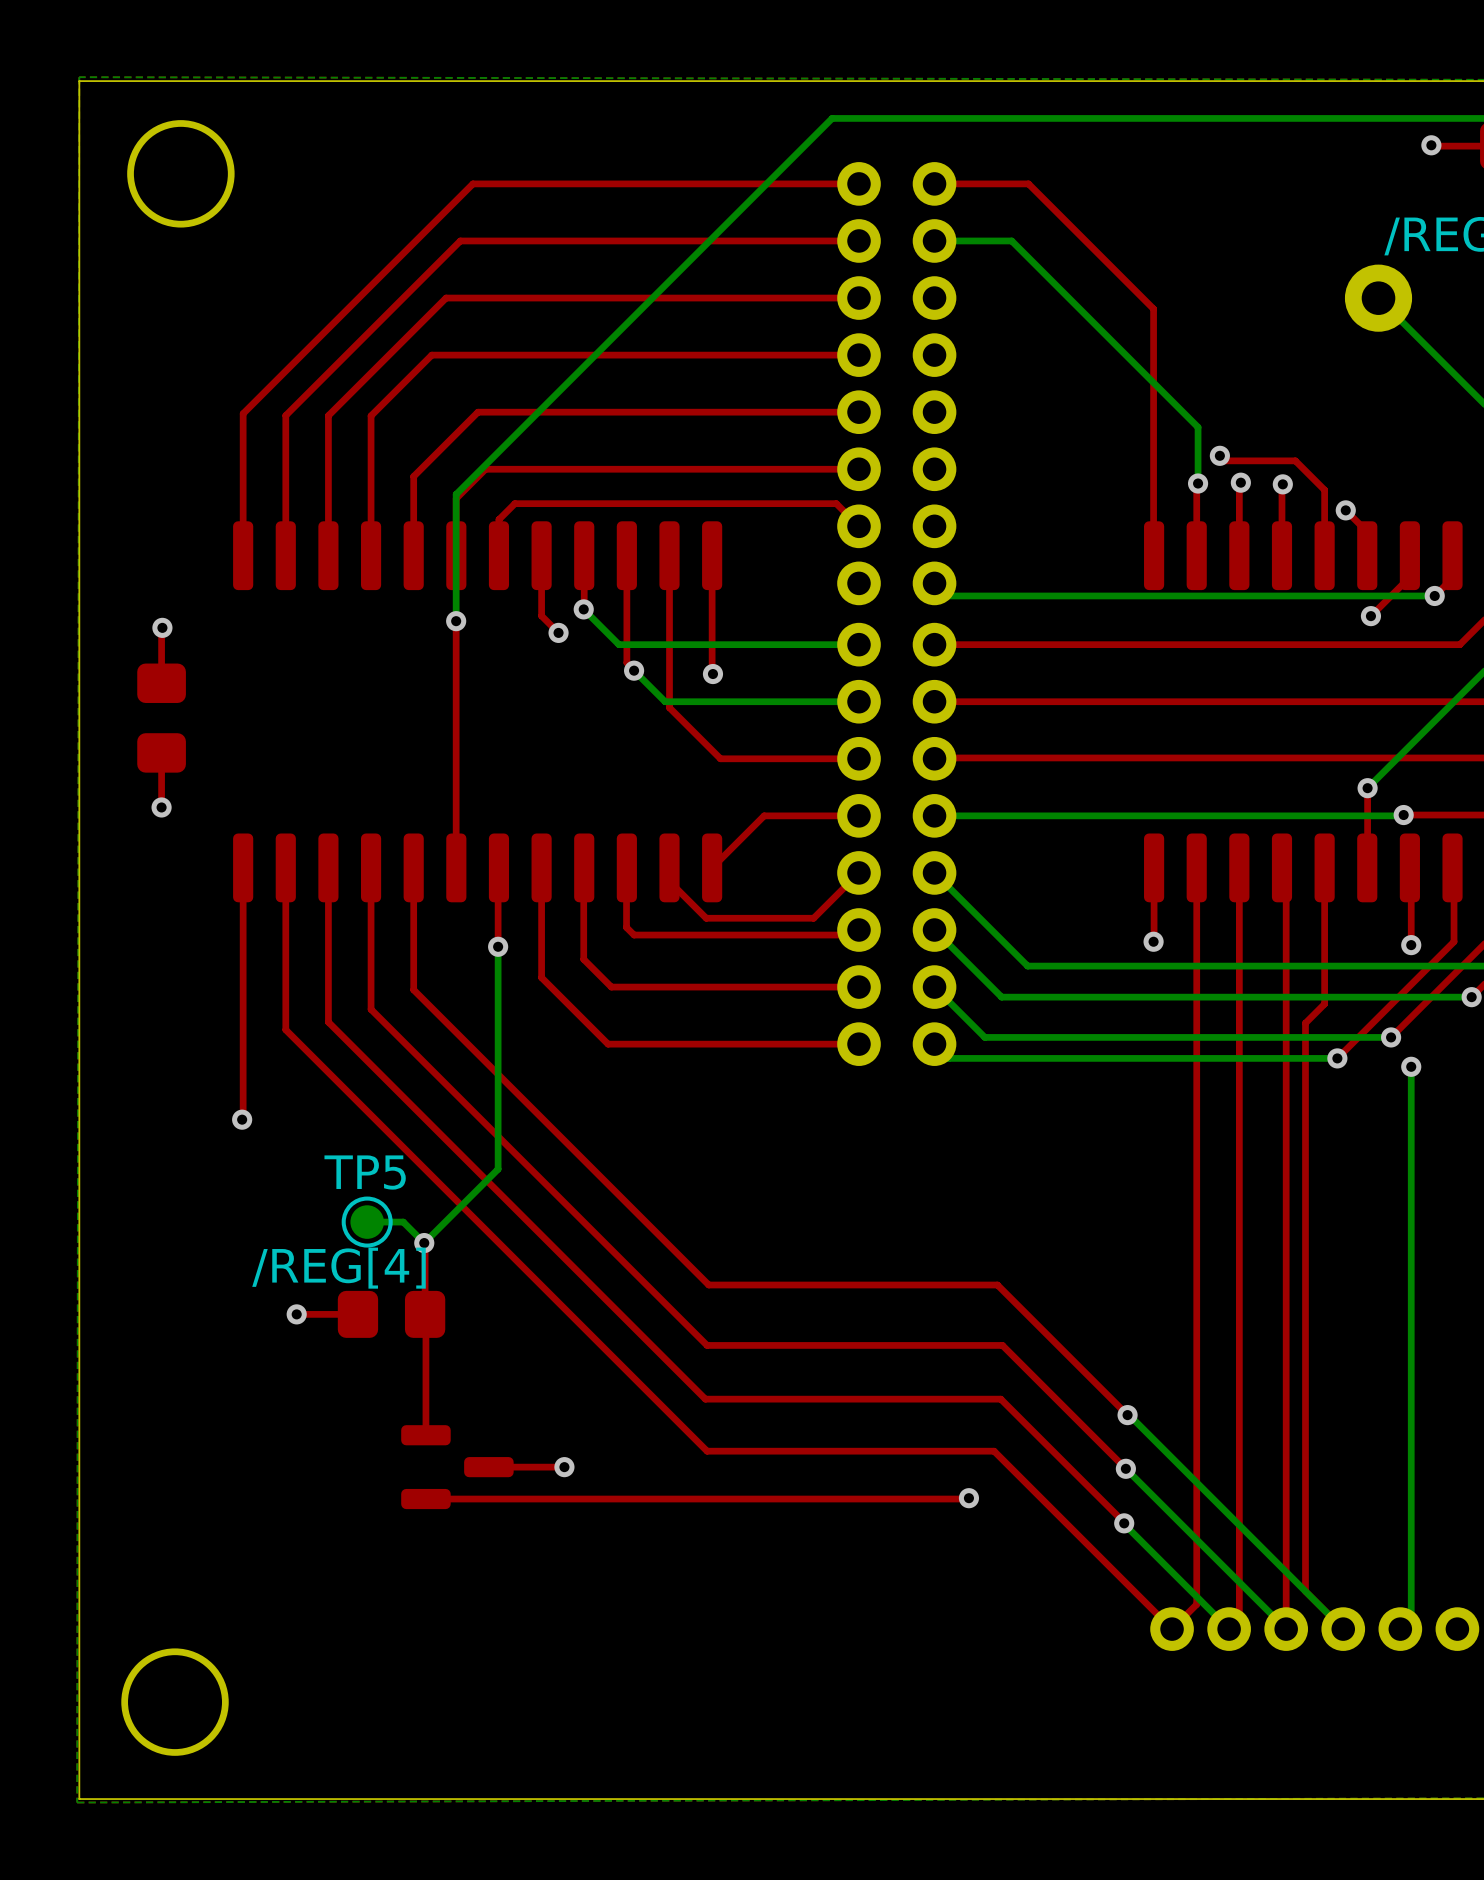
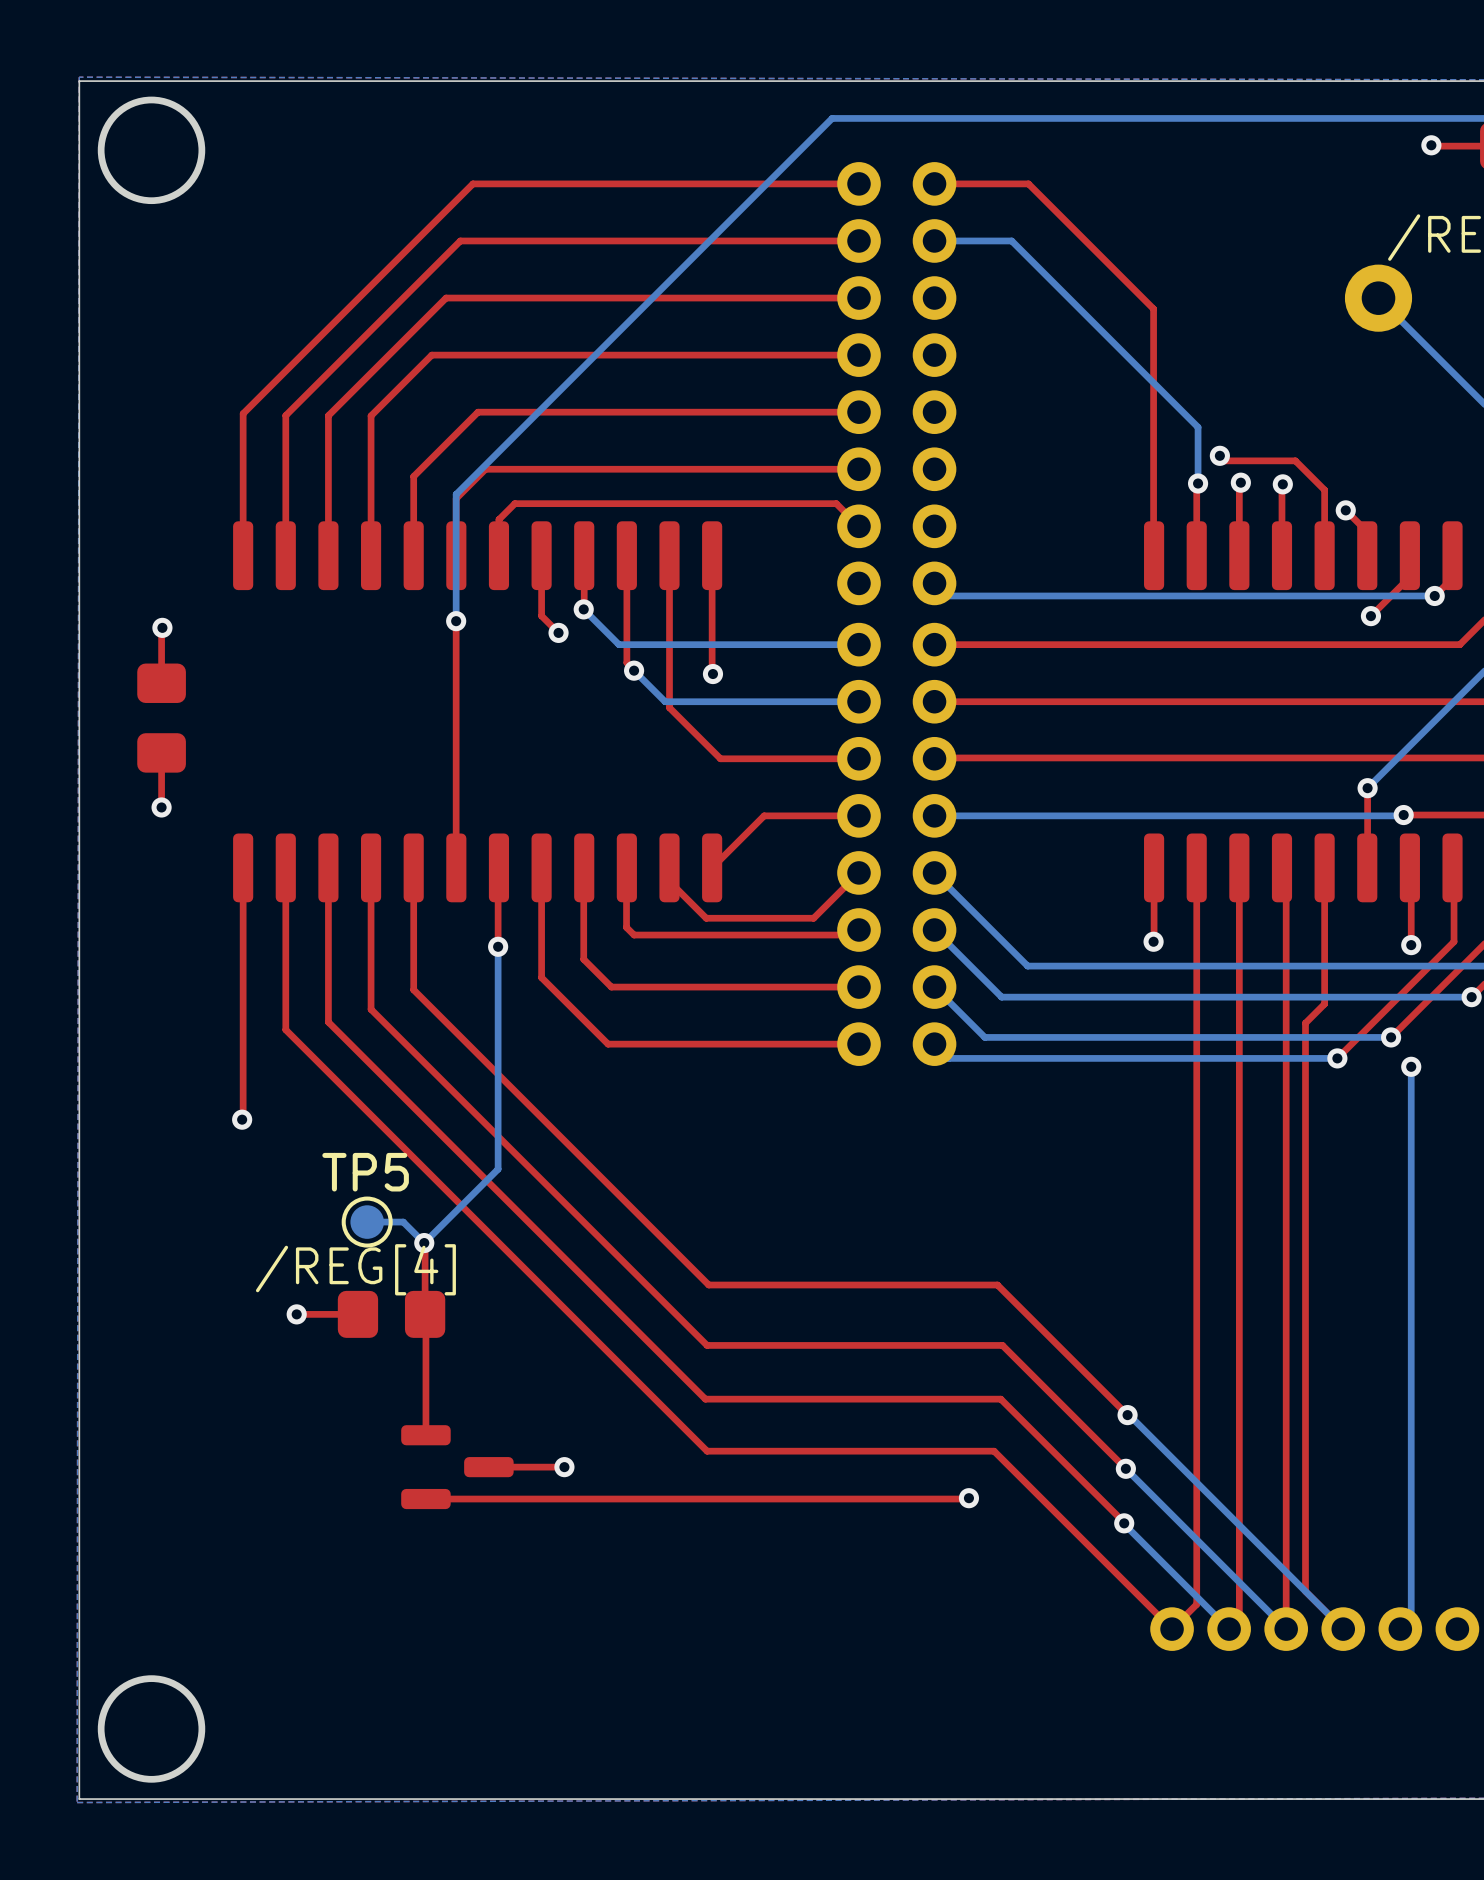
round board edge position: (180, 173) -> (151, 150)
round board edge position: (175, 1702) -> (151, 1728)

